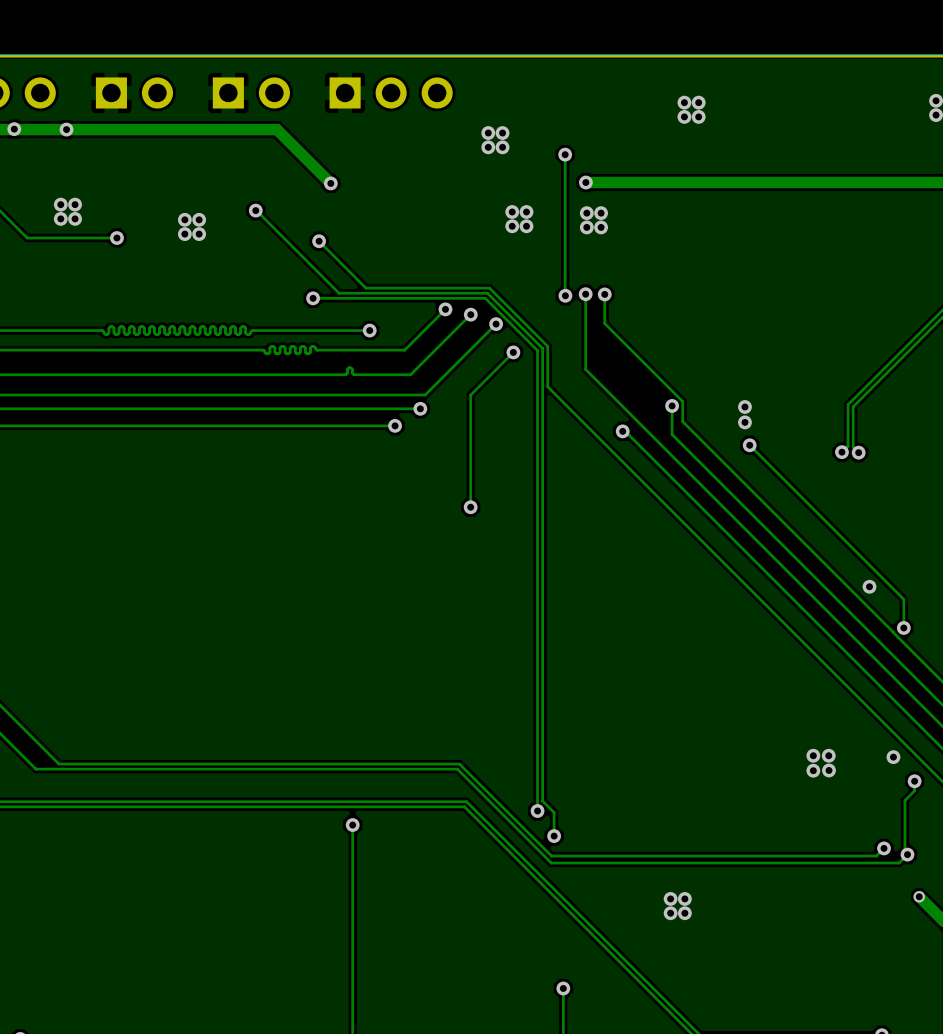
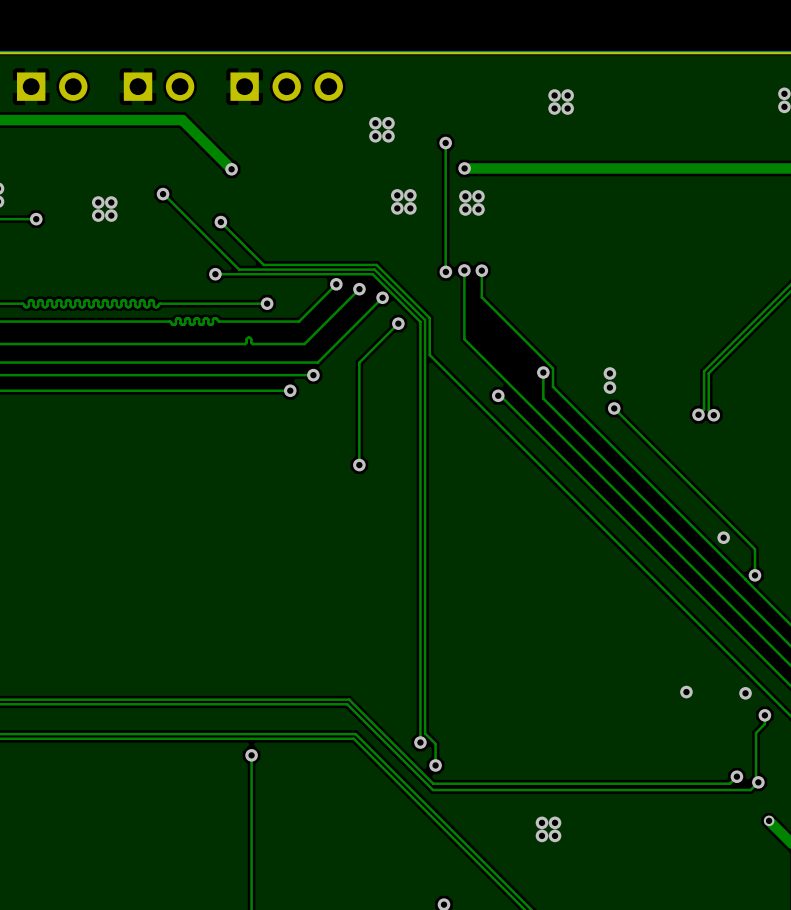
via: (813, 755) -> none
via: (813, 770) -> none
via: (829, 770) -> none

